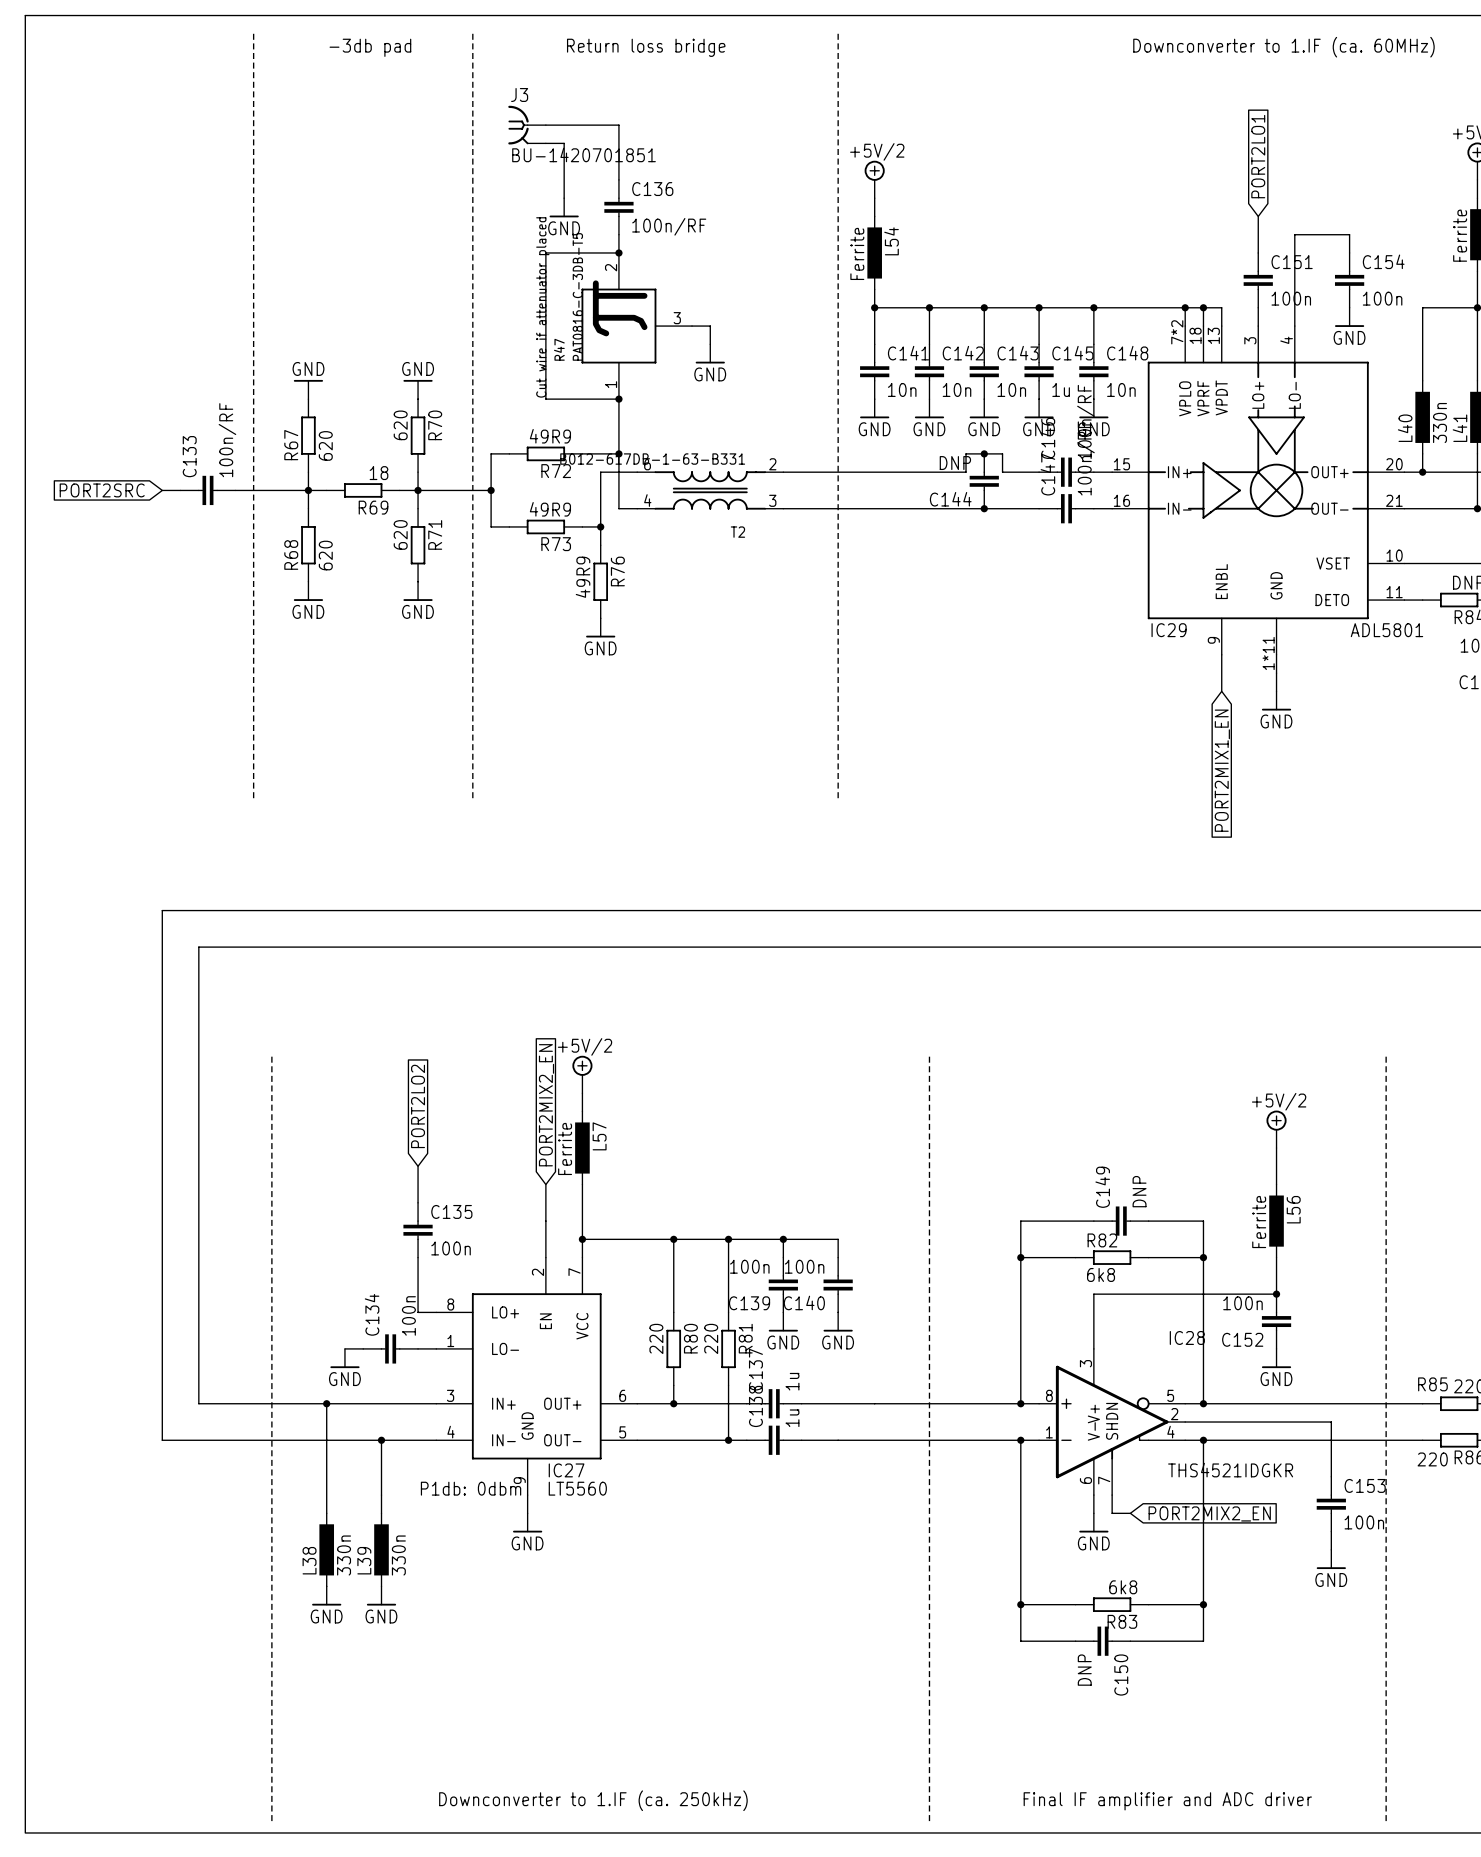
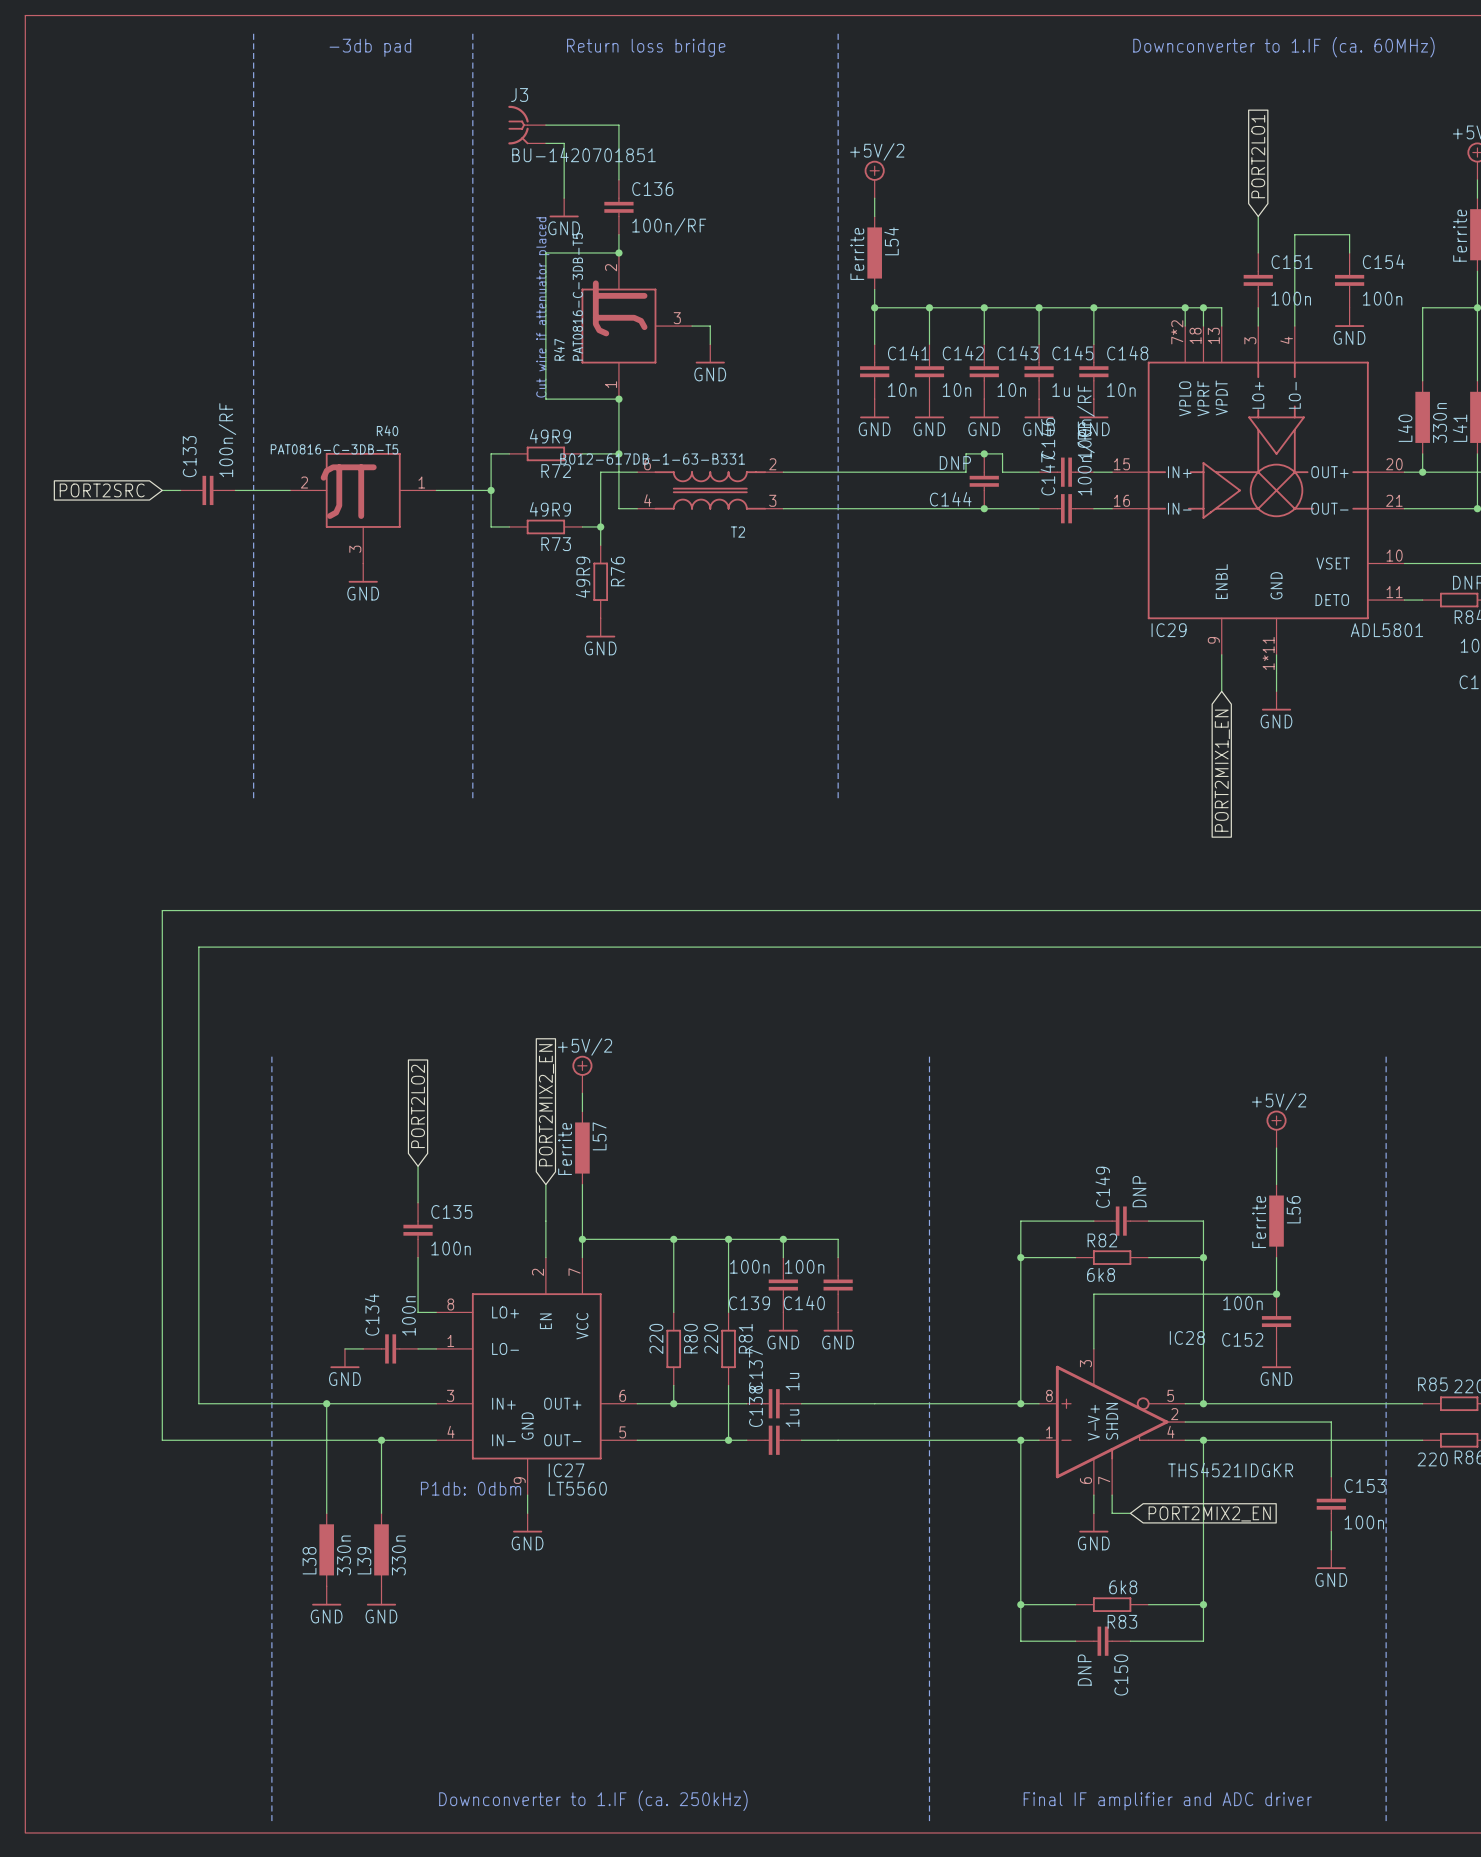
power symbol: GND (308, 389) -> none
power symbol: GND (418, 389) -> none
R67: 620 (308, 435) -> none
R70: 620 (418, 435) -> none
wire: (308, 472) (308, 508) -> none
wire: (418, 472) (418, 508) -> none
junction: (308, 490) -> none
R69: 18 (363, 490) -> none
junction: (418, 490) -> none
R40: none -> PAT0816-C-3DB-T5 (363, 508)
R68: 620 (308, 545) -> none
R71: 620 (418, 545) -> none
power symbol: none -> GND (363, 573)
power symbol: GND (308, 591) -> none
power symbol: GND (418, 591) -> none

